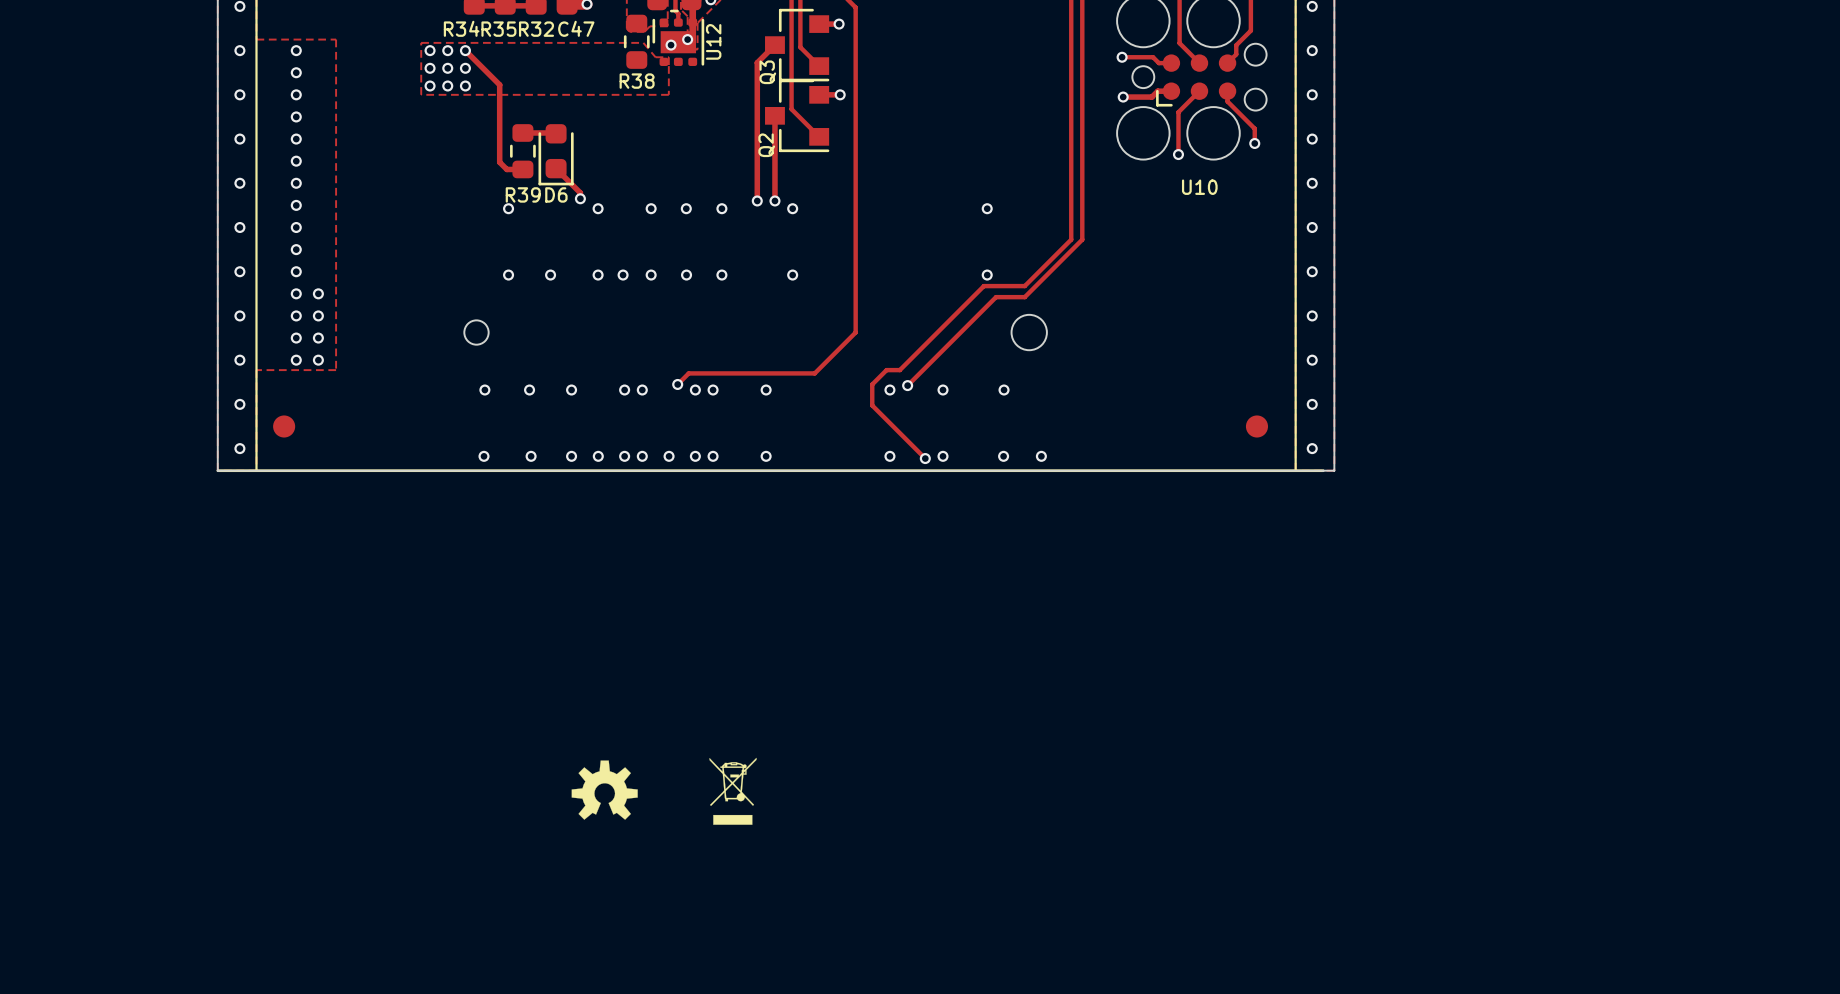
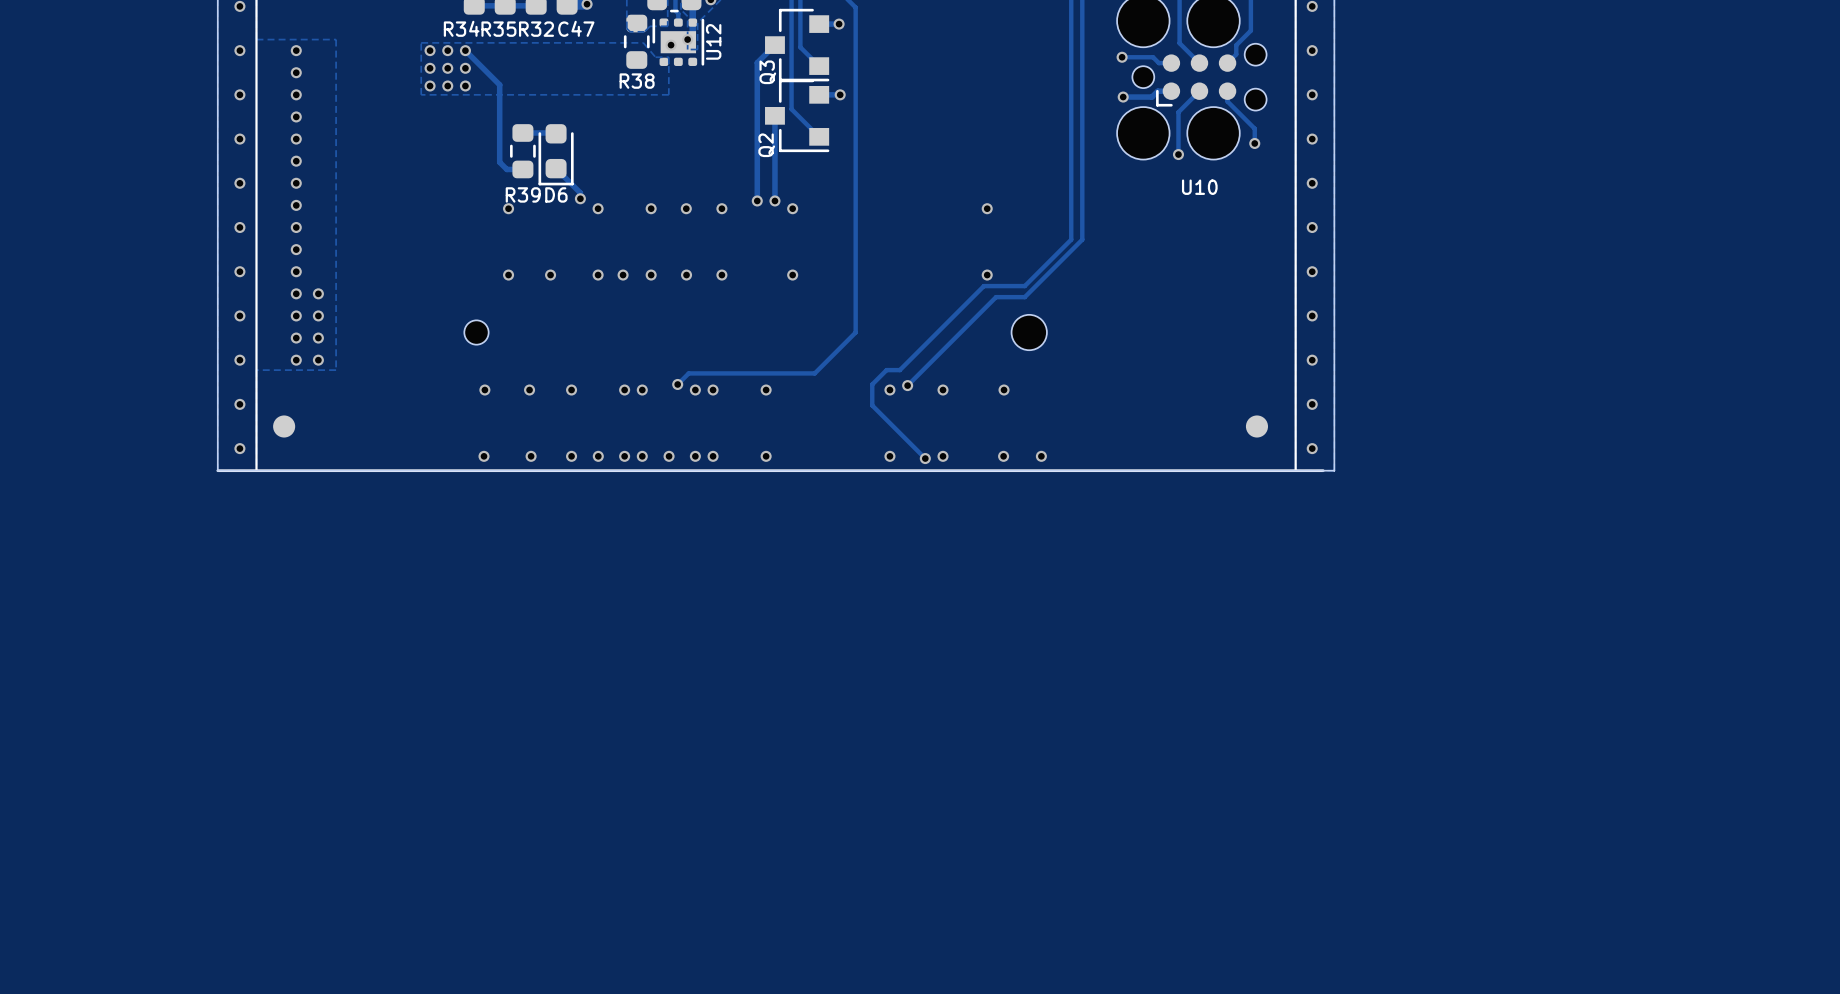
drawing: [709, 757, 757, 825] -> none
drawing: [571, 760, 638, 820] -> none

